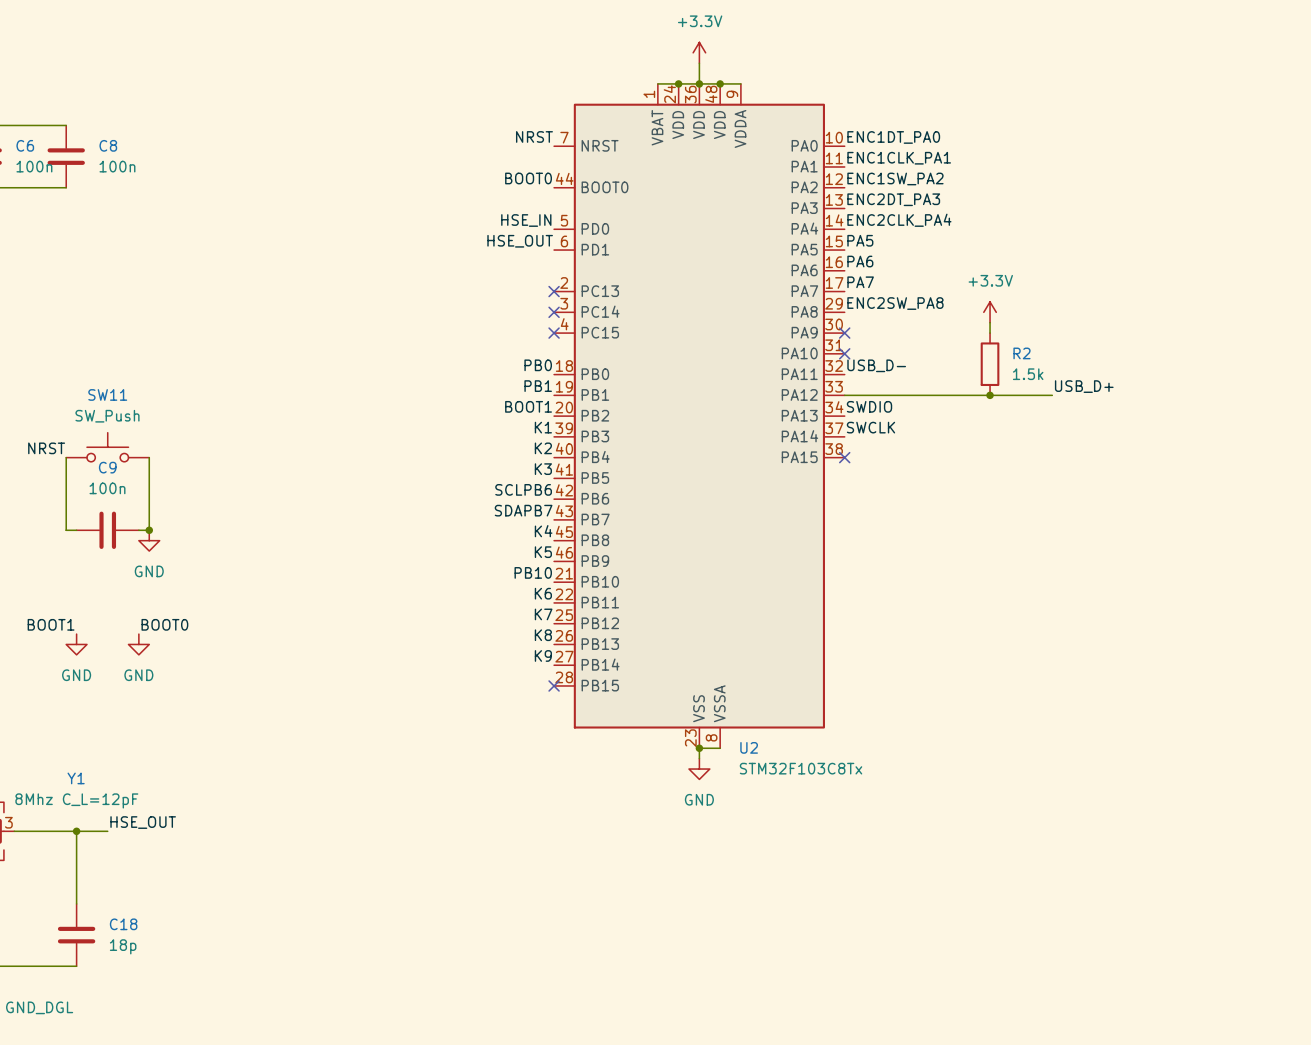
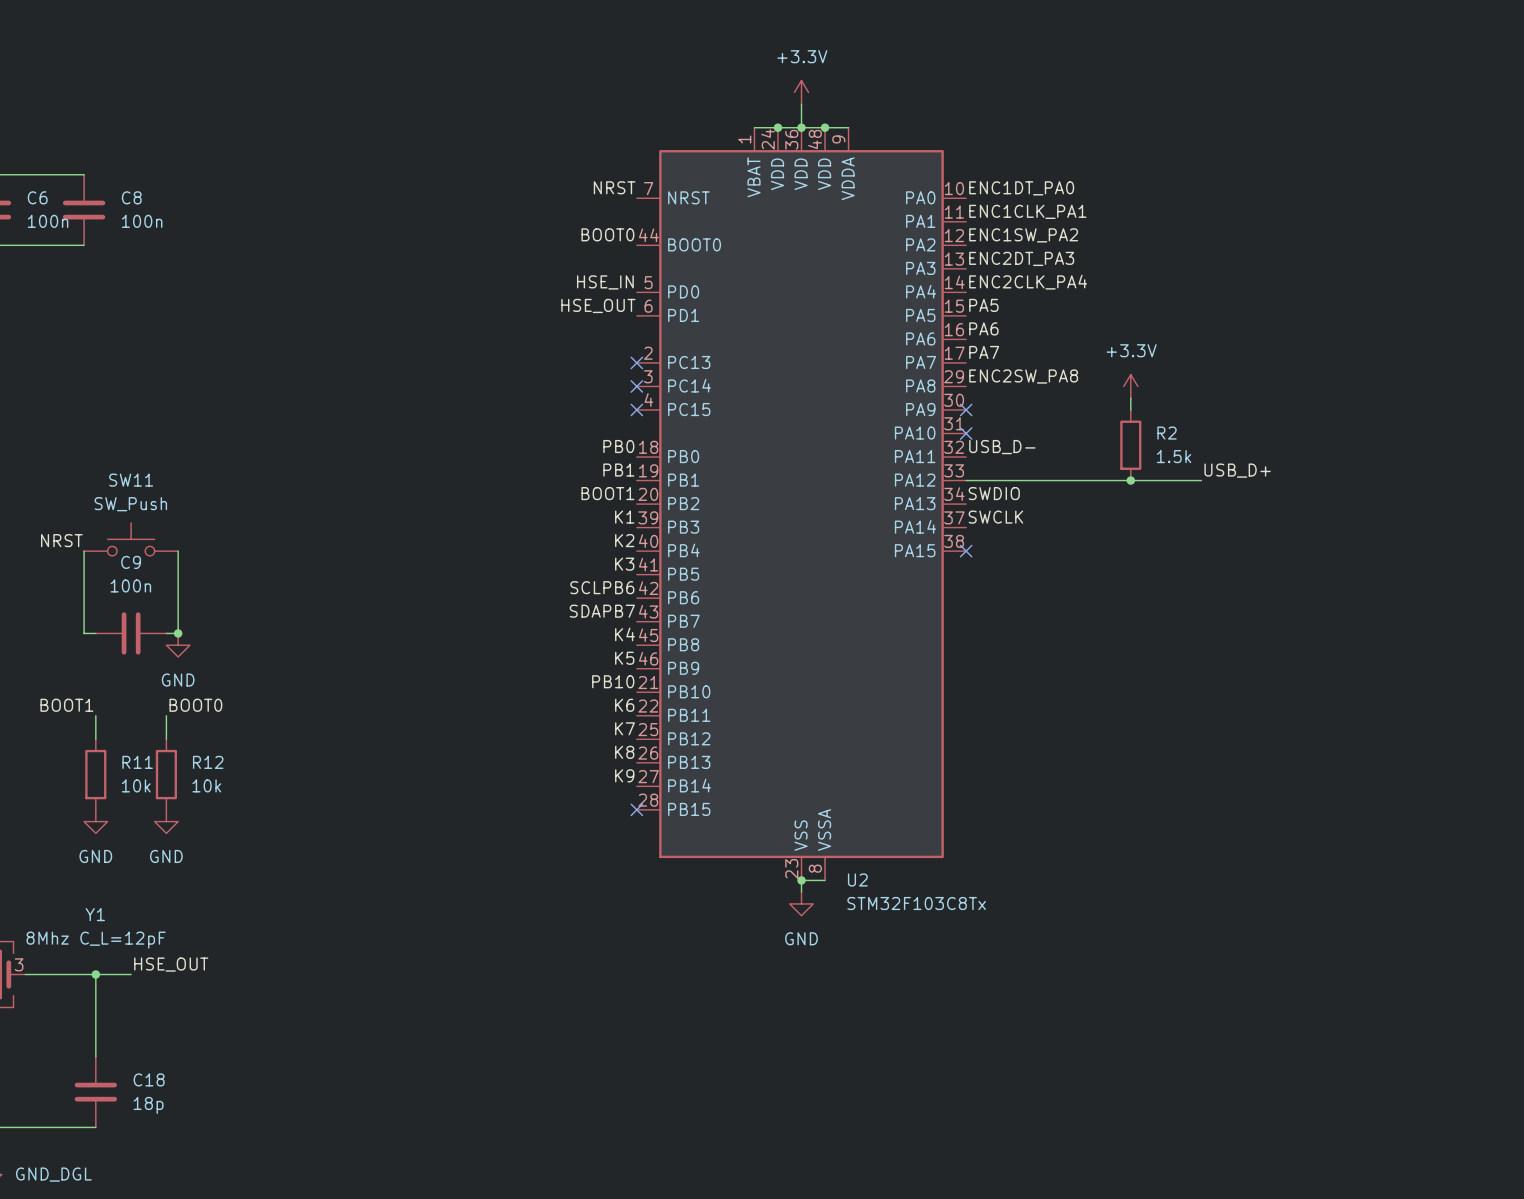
wire: none -> (95, 715) (95, 739)
wire: none -> (166, 715) (166, 739)
label position: BOOT1 (51, 624) -> BOOT1 (66, 705)
label position: BOOT0 (164, 624) -> BOOT0 (195, 705)
power symbol: GND (76, 644) -> none
power symbol: GND (138, 644) -> none
R11: none -> 10k (95, 774)
R12: none -> 10k (166, 774)
power symbol: none -> GND (95, 821)
power symbol: none -> GND (166, 821)

